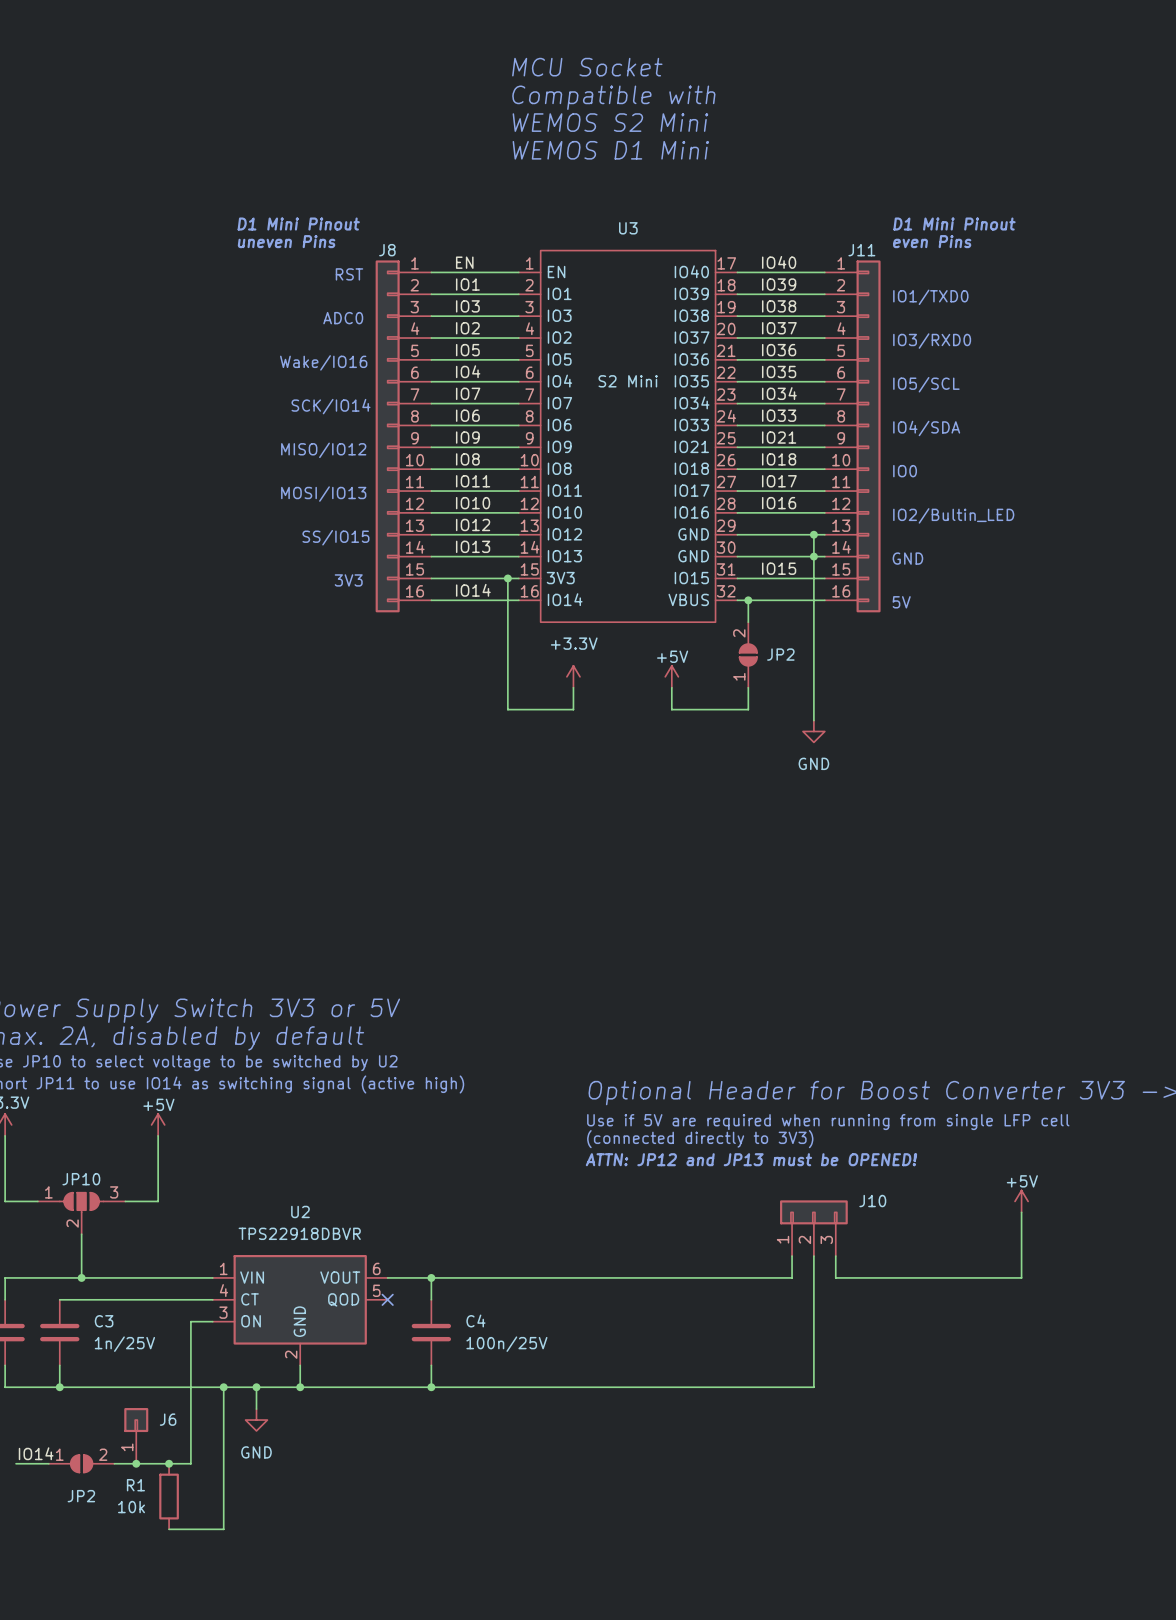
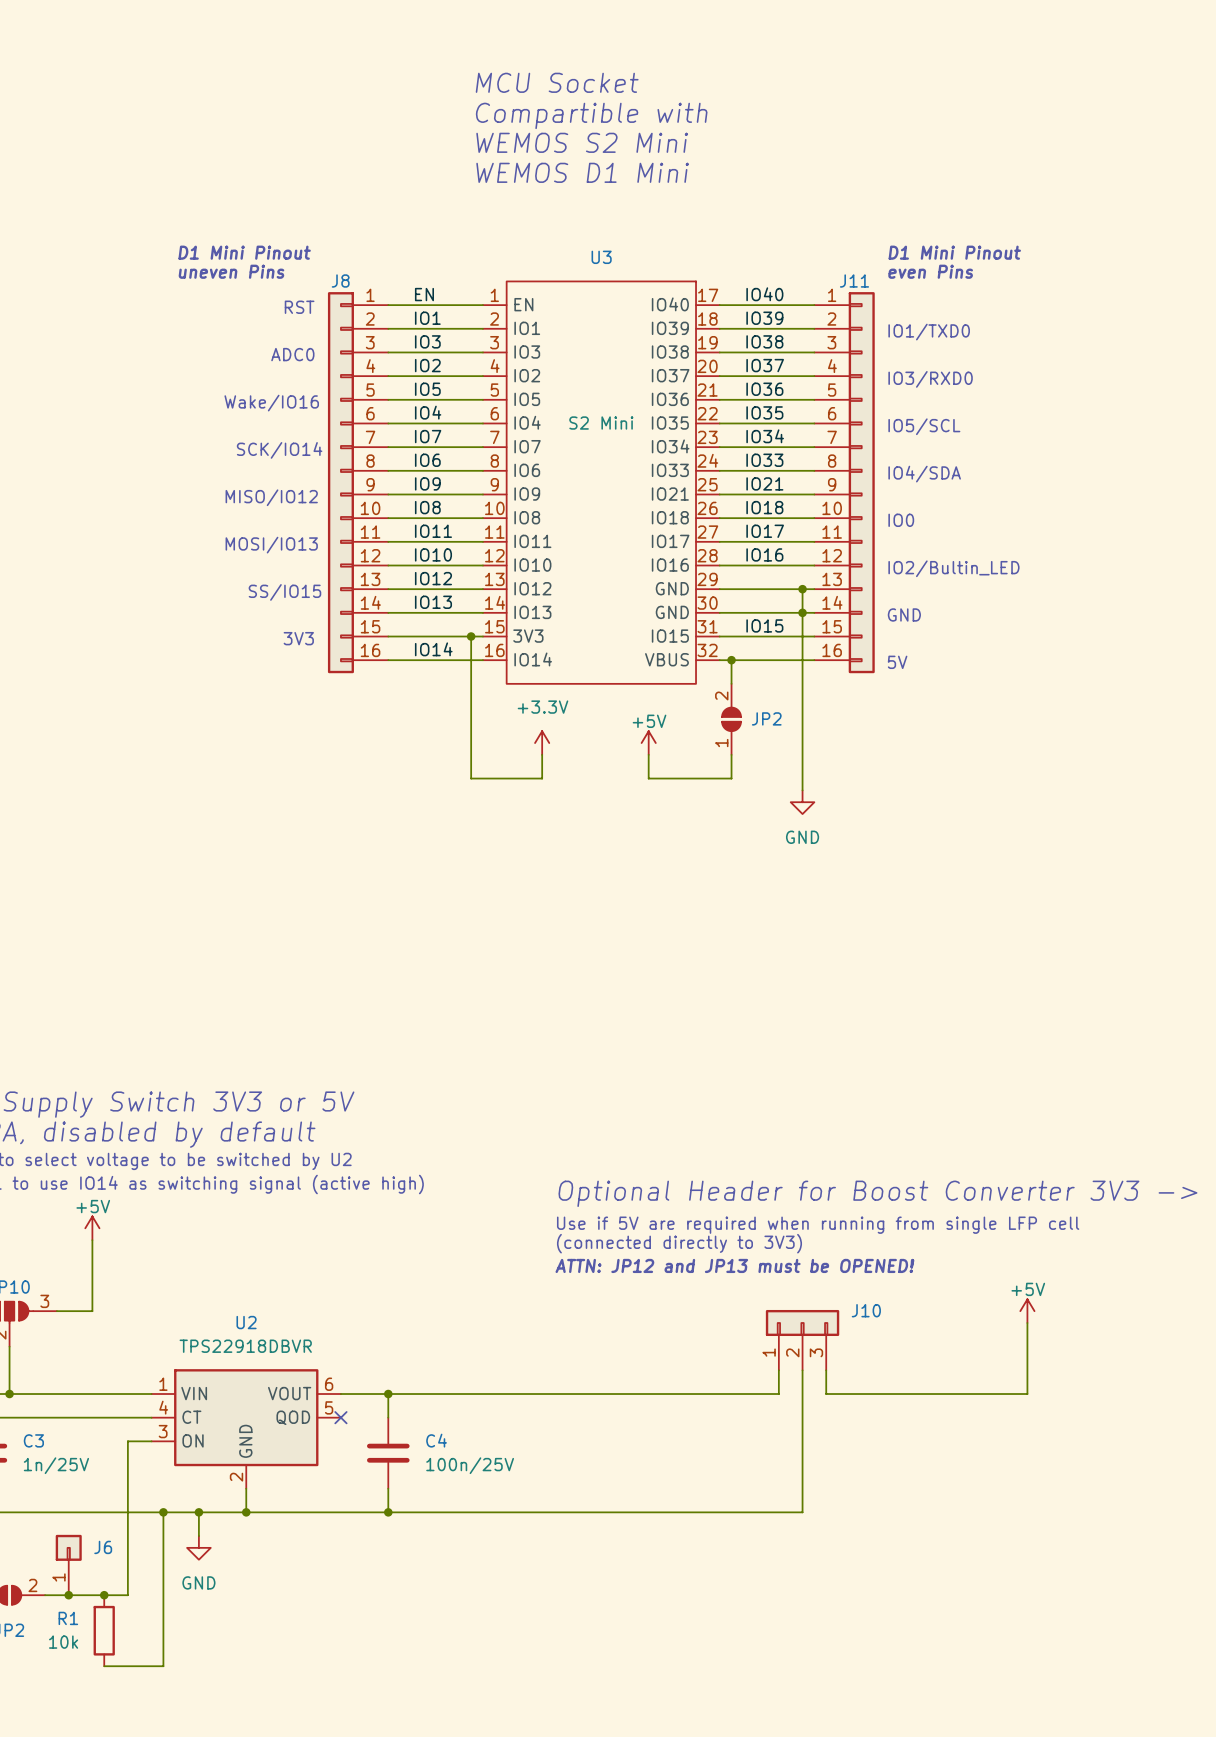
text: Compatible with (613, 97) -> Compartible with (591, 115)

